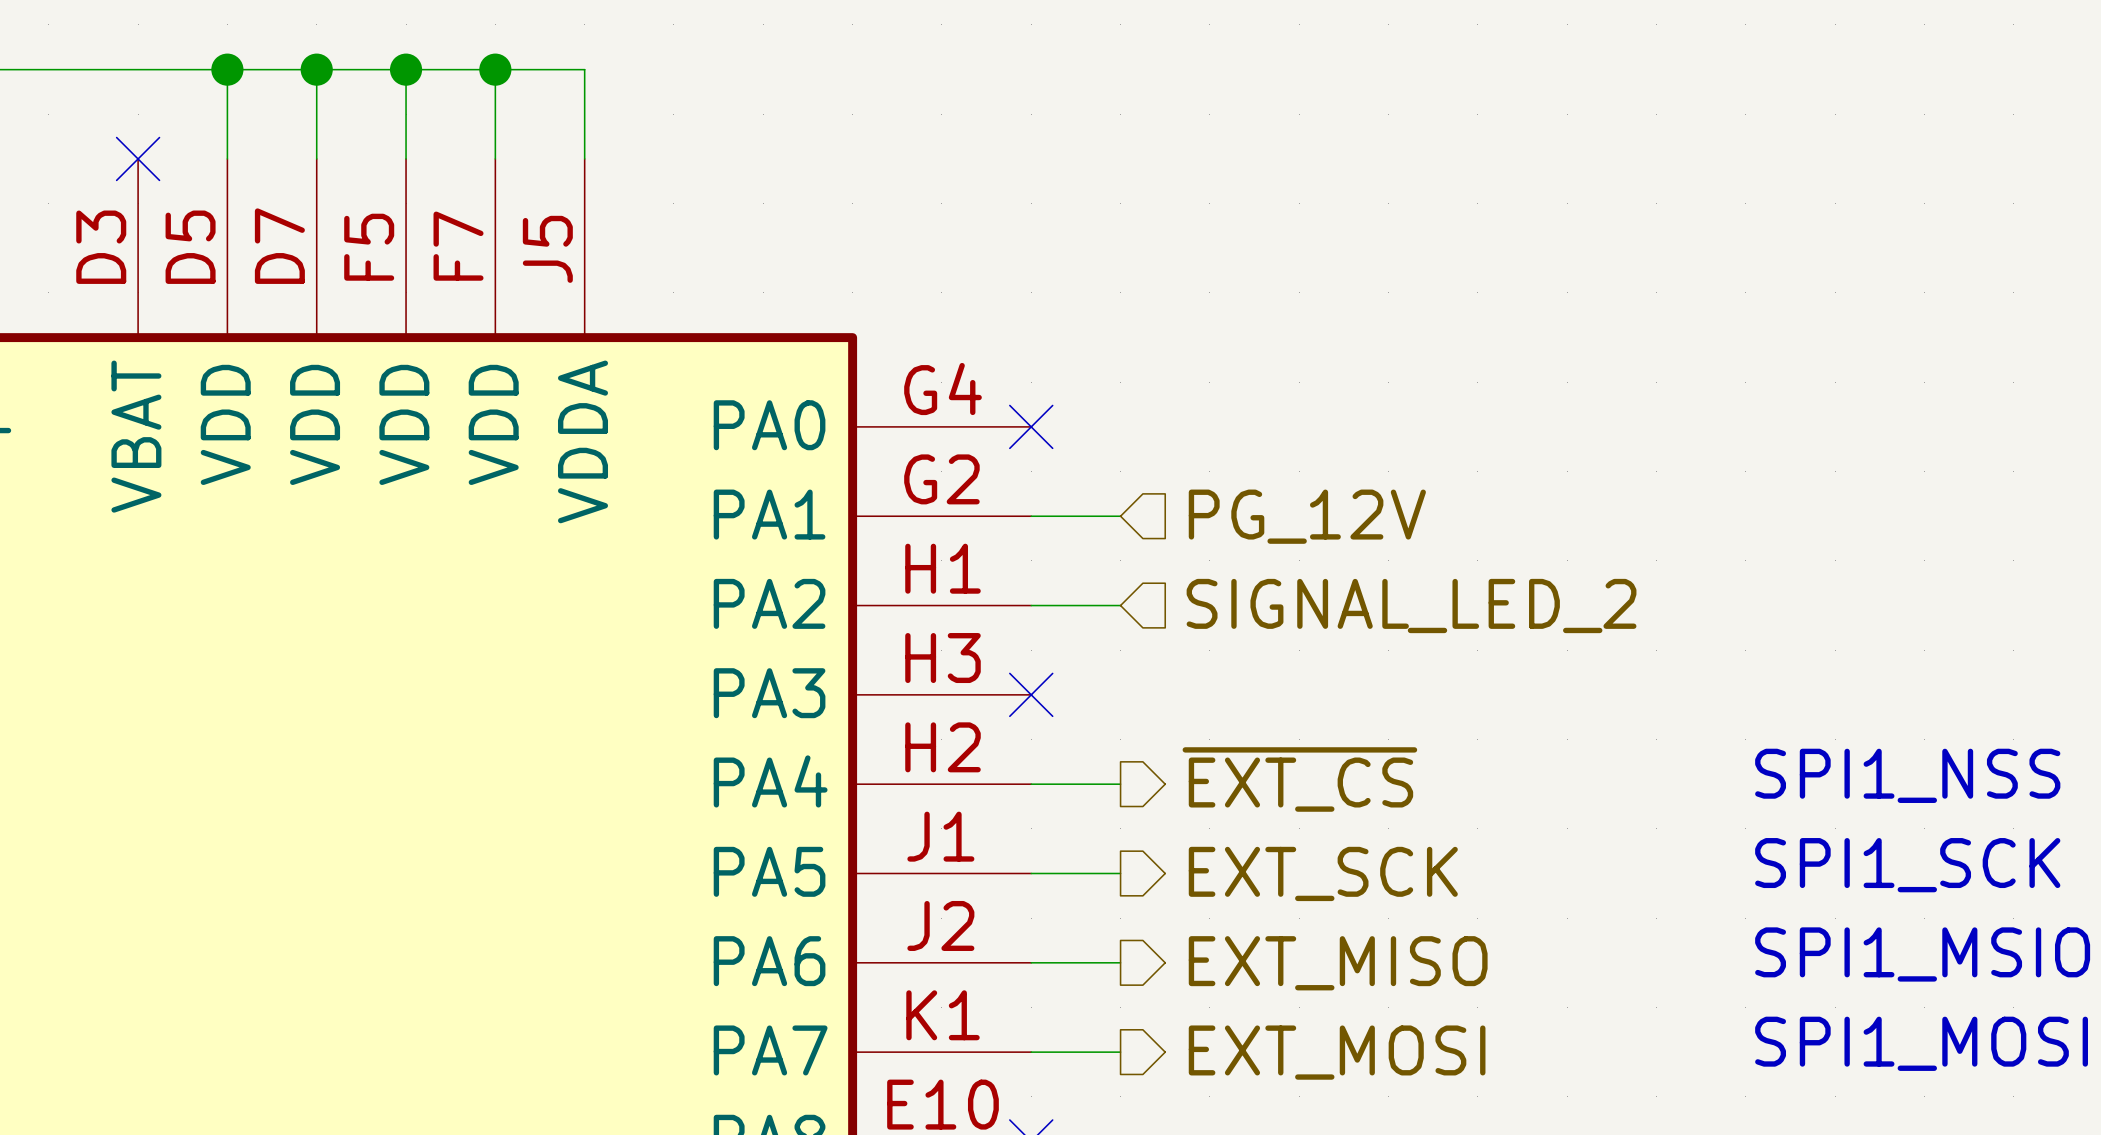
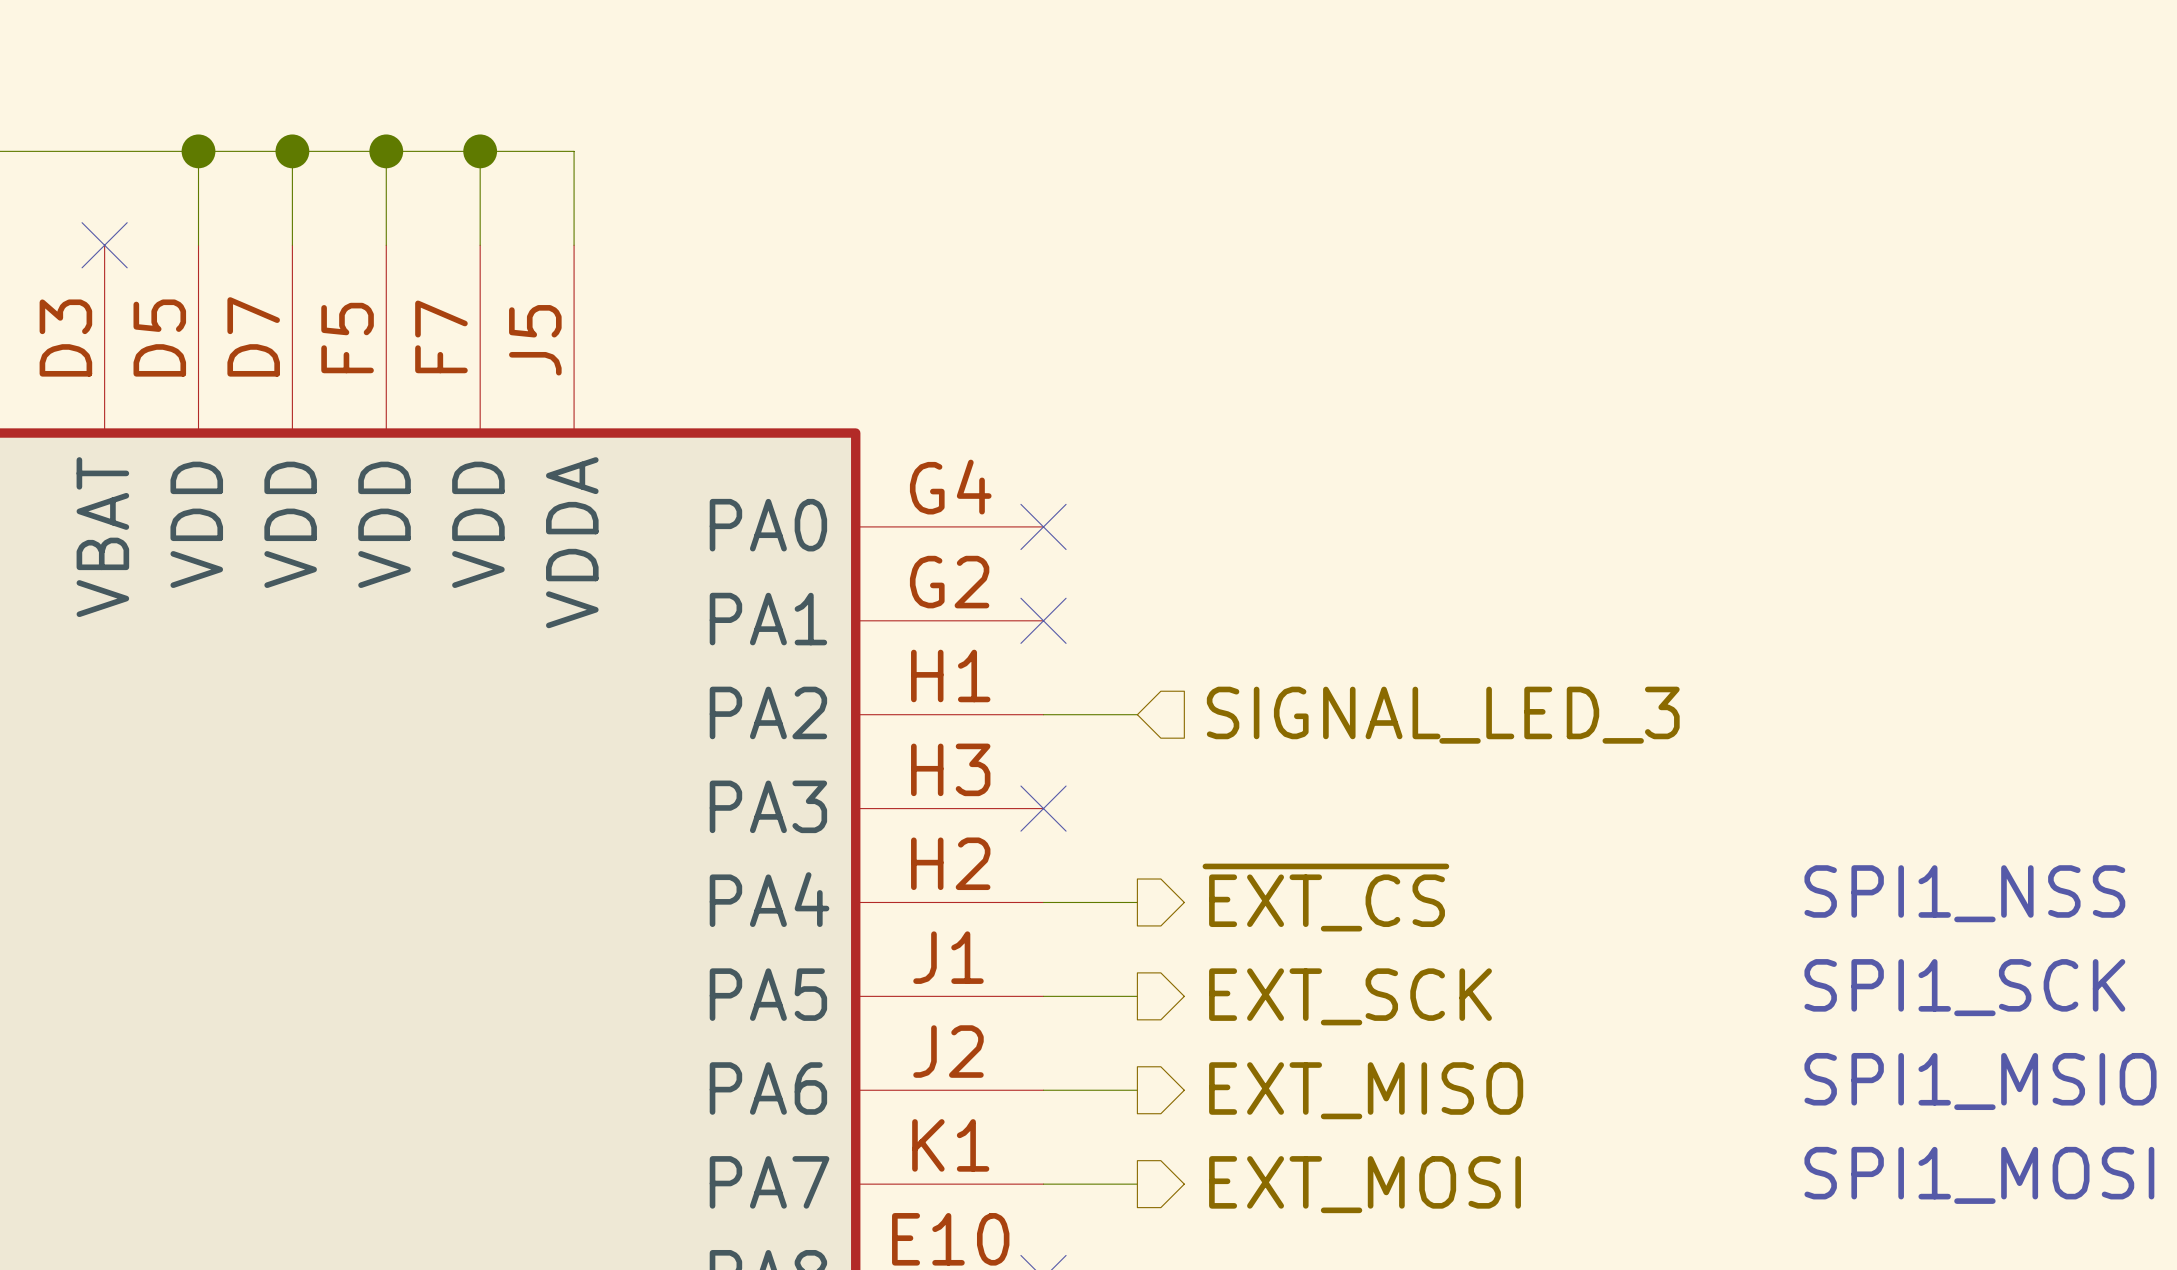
wire: (1031, 516) (1120, 516) -> none
no-connect mark: none -> (1043, 620)
hierarchical label: PG_12V (1307, 516) -> none
hierarchical label: SIGNAL_LED_2 (1411, 606) -> SIGNAL_LED_3 (1443, 715)

